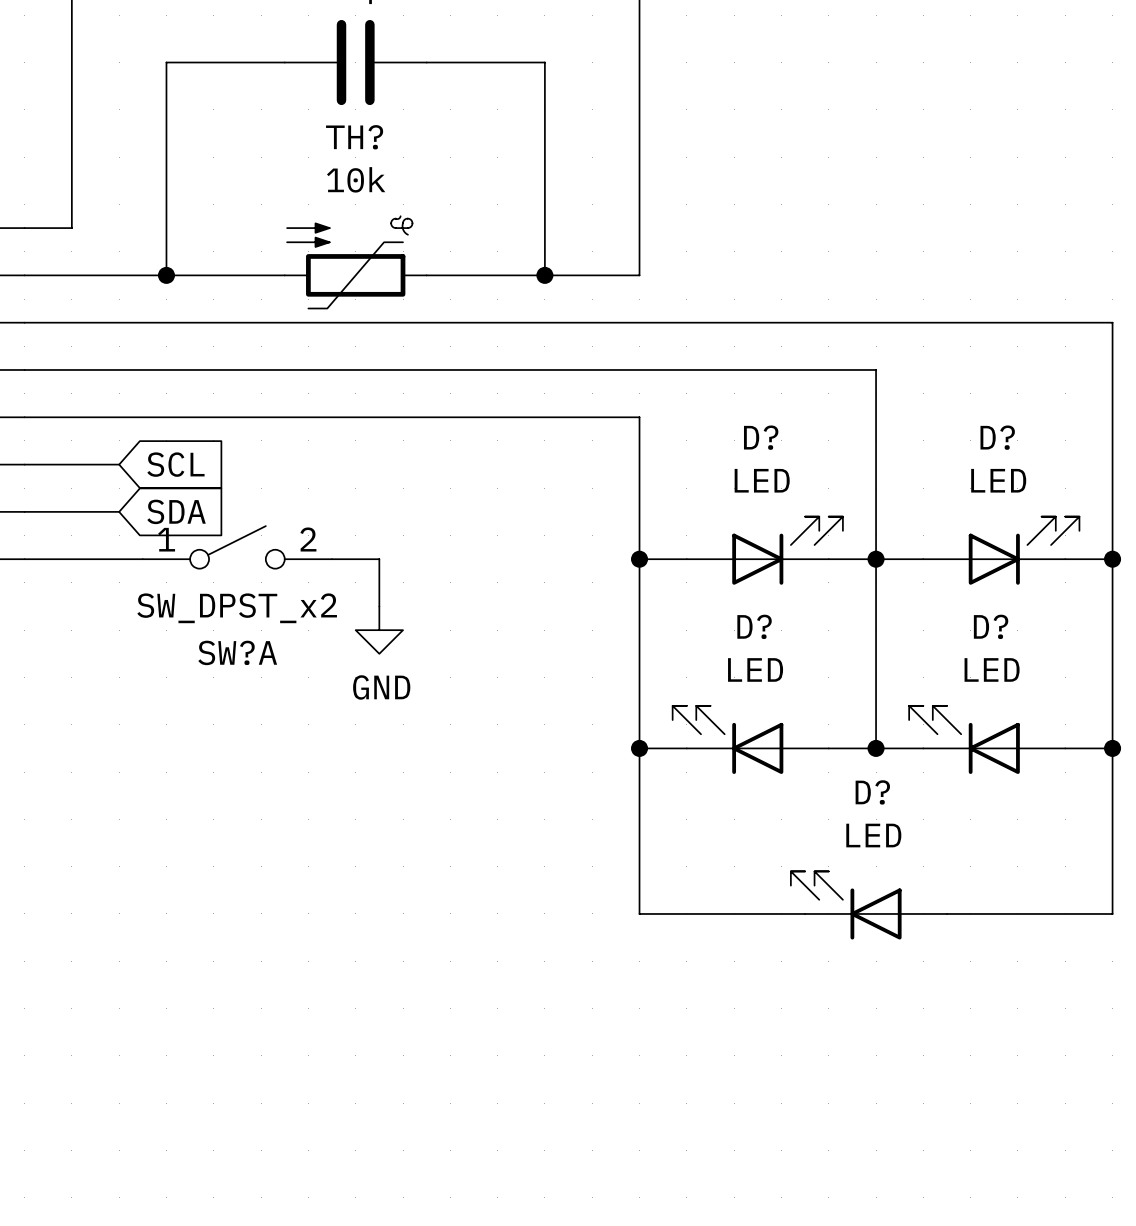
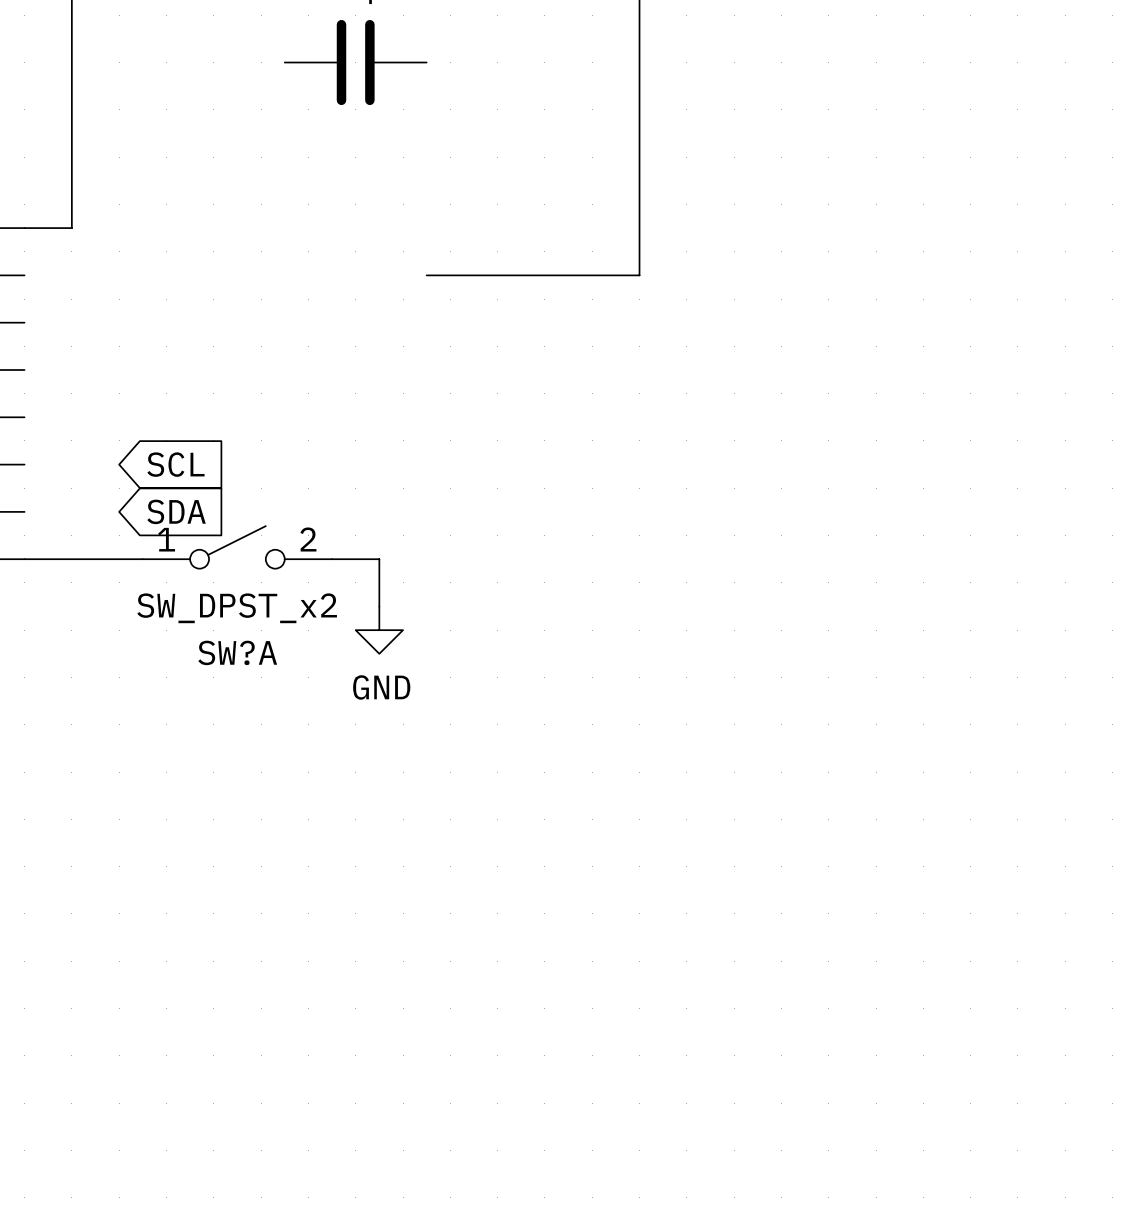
wire: (284, 62) (166, 62) (166, 275) -> none
wire: (426, 62) (544, 62) (544, 275) -> none
TH?: 10k (355, 262) -> none
wire: (24, 275) (284, 275) -> none
junction: (166, 275) -> none
junction: (544, 275) -> none
wire: (24, 322) (1112, 322) (1112, 913) (946, 913) -> none
wire: (24, 369) (876, 369) (876, 748) -> none
wire: (24, 417) (639, 417) (639, 913) (805, 913) -> none
wire: (24, 464) (119, 464) -> none
wire: (24, 511) (119, 511) -> none
D?: LED (764, 550) -> none
D?: LED (1001, 550) -> none
wire: (639, 559) (686, 559) -> none
junction: (639, 559) -> none
wire: (828, 559) (923, 559) -> none
junction: (876, 559) -> none
wire: (1065, 559) (1112, 559) -> none
junction: (1112, 559) -> none
D?: LED (750, 739) -> none
D?: LED (987, 739) -> none
wire: (639, 748) (686, 748) -> none
junction: (639, 748) -> none
wire: (828, 748) (923, 748) -> none
junction: (876, 748) -> none
wire: (1065, 748) (1112, 748) -> none
junction: (1112, 748) -> none
D?: LED (868, 905) -> none

